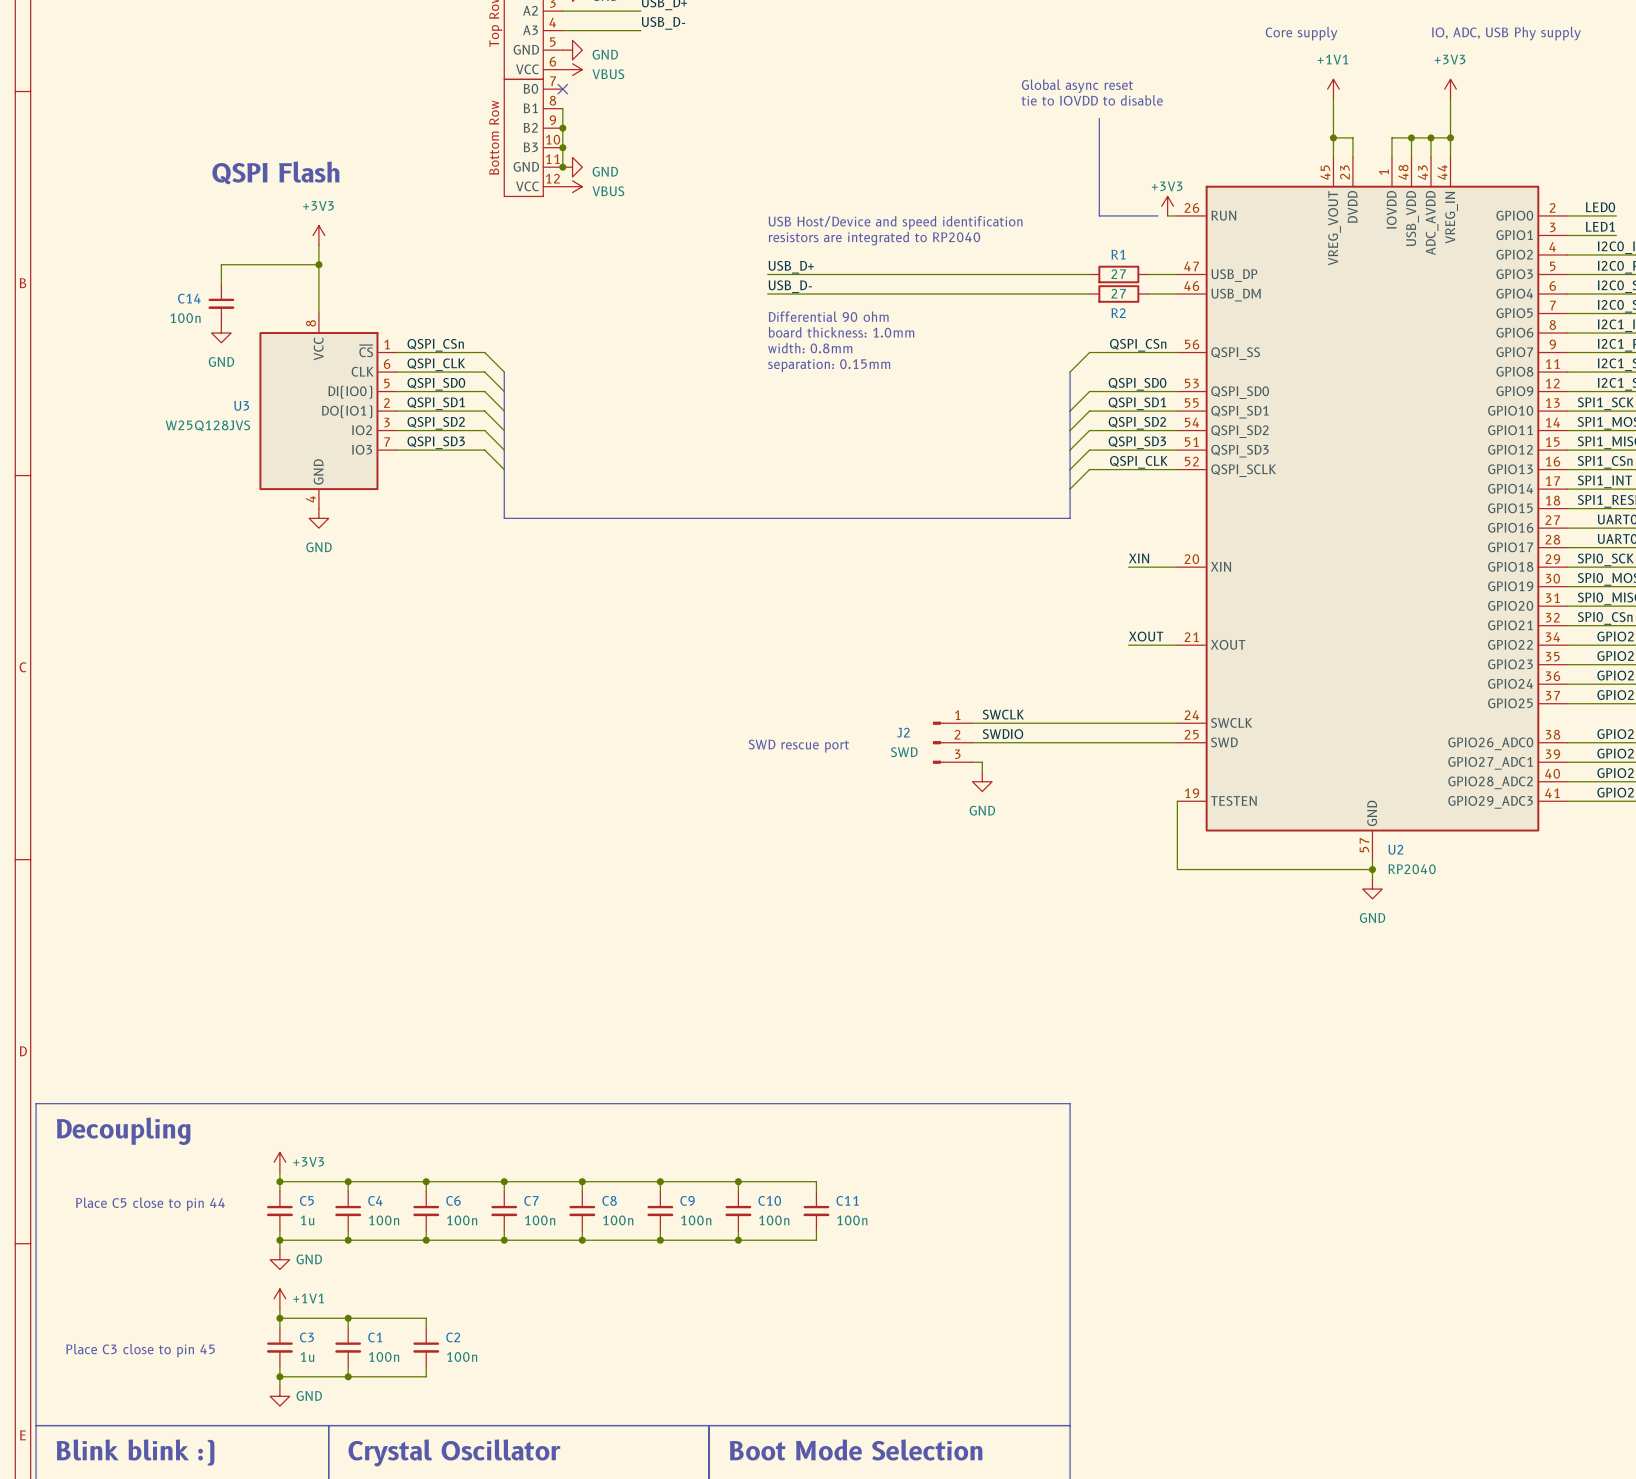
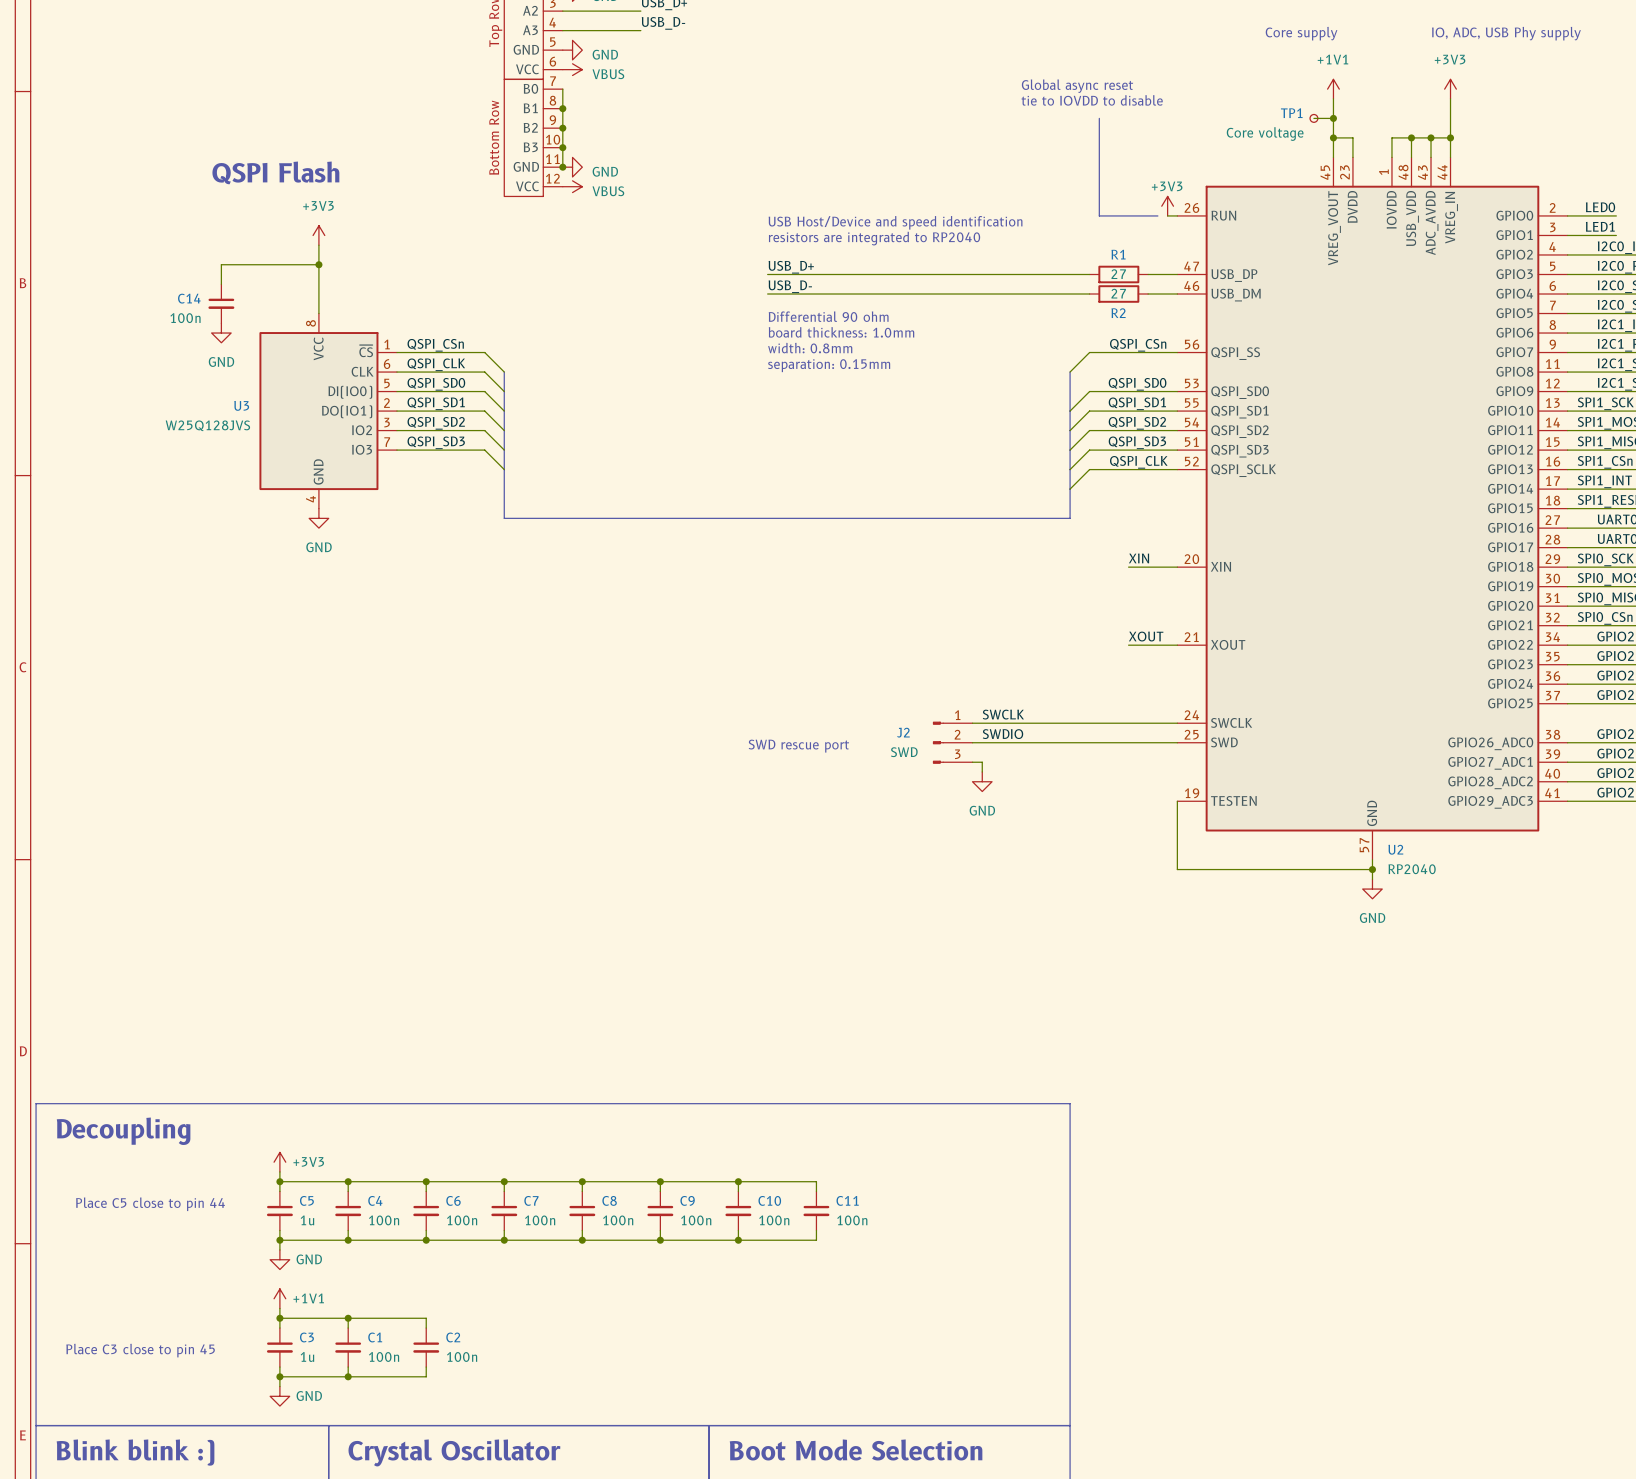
wire: none -> (562, 89) (562, 108)
no-connect mark: (562, 89) -> none
junction: none -> (562, 108)
wire: none -> (1313, 118) (1333, 118)
TP1: none -> Core voltage (1313, 118)
junction: none -> (1333, 118)

